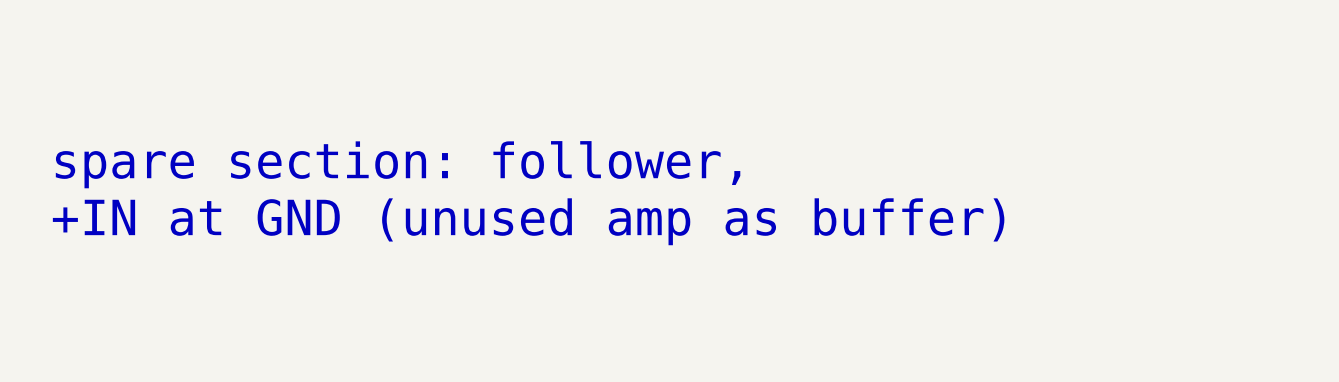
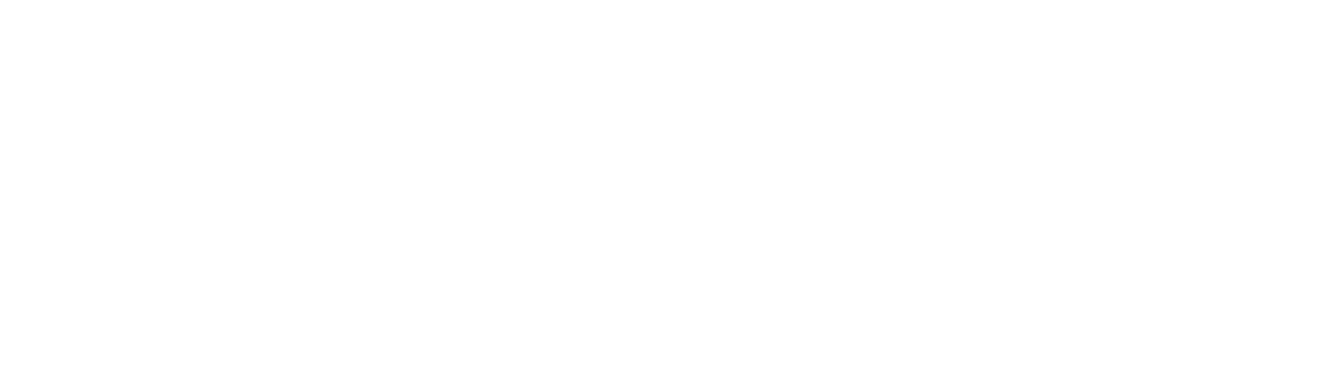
text: spare section: follower, (398, 164) -> none
text: +IN at GND (unused amp as buffer) (528, 221) -> none

